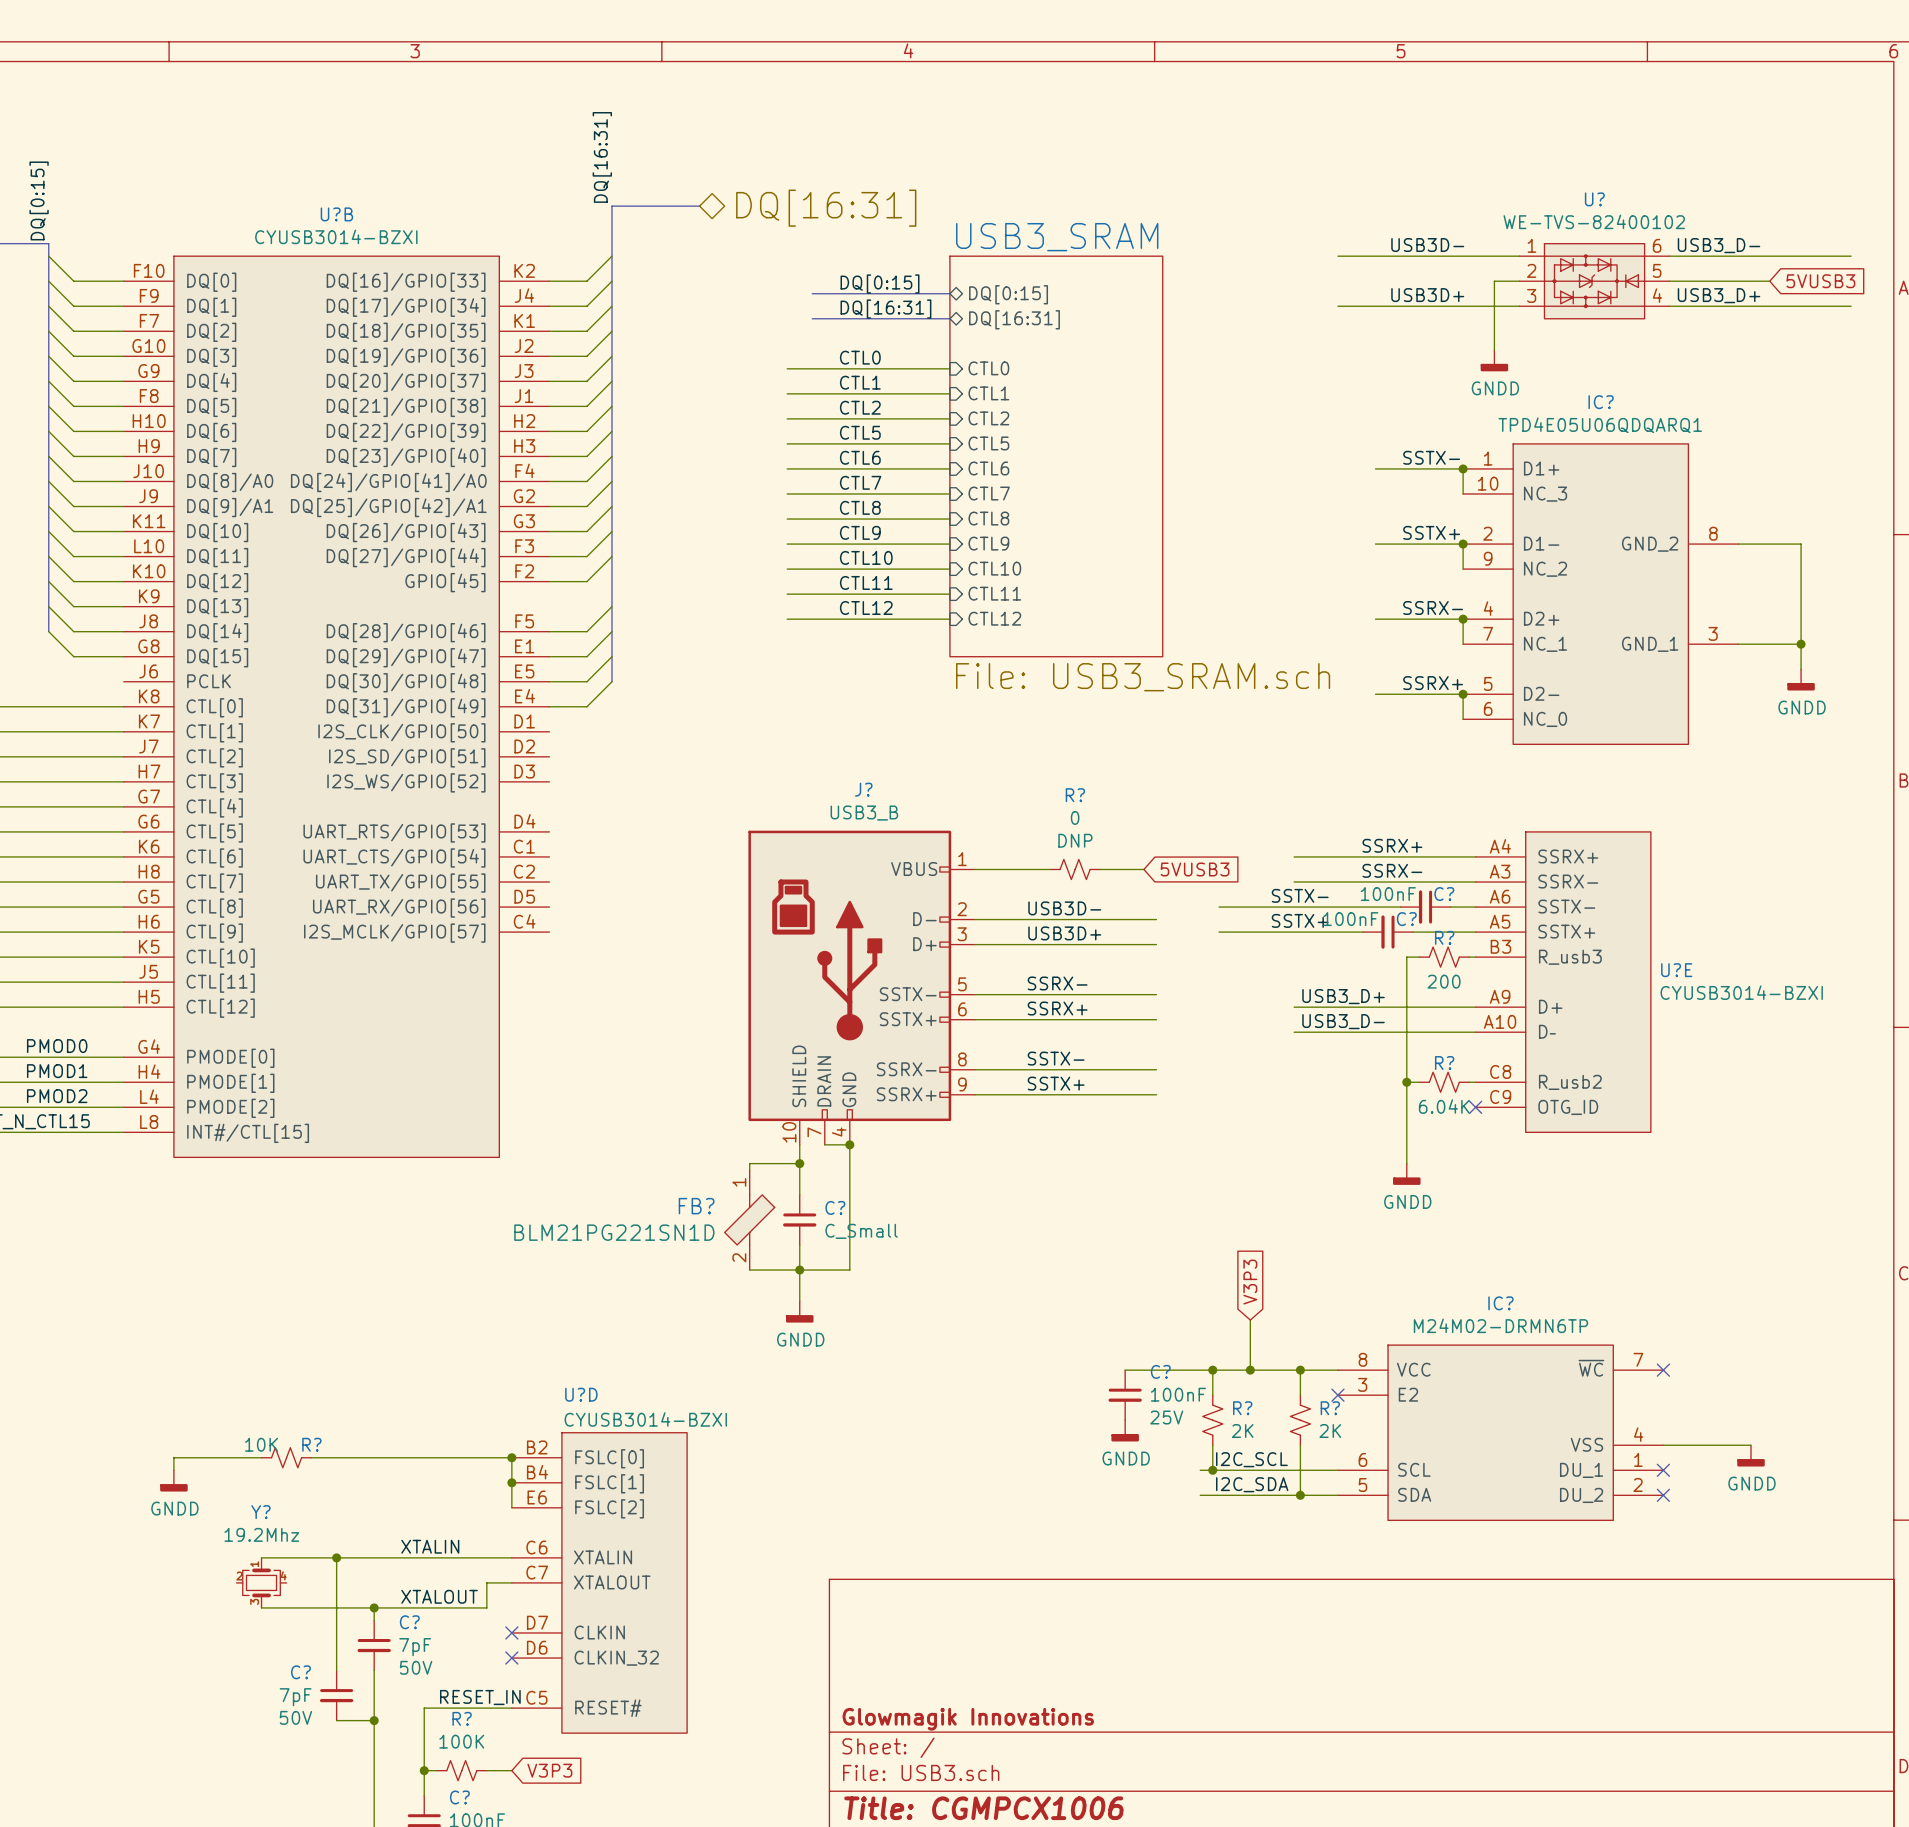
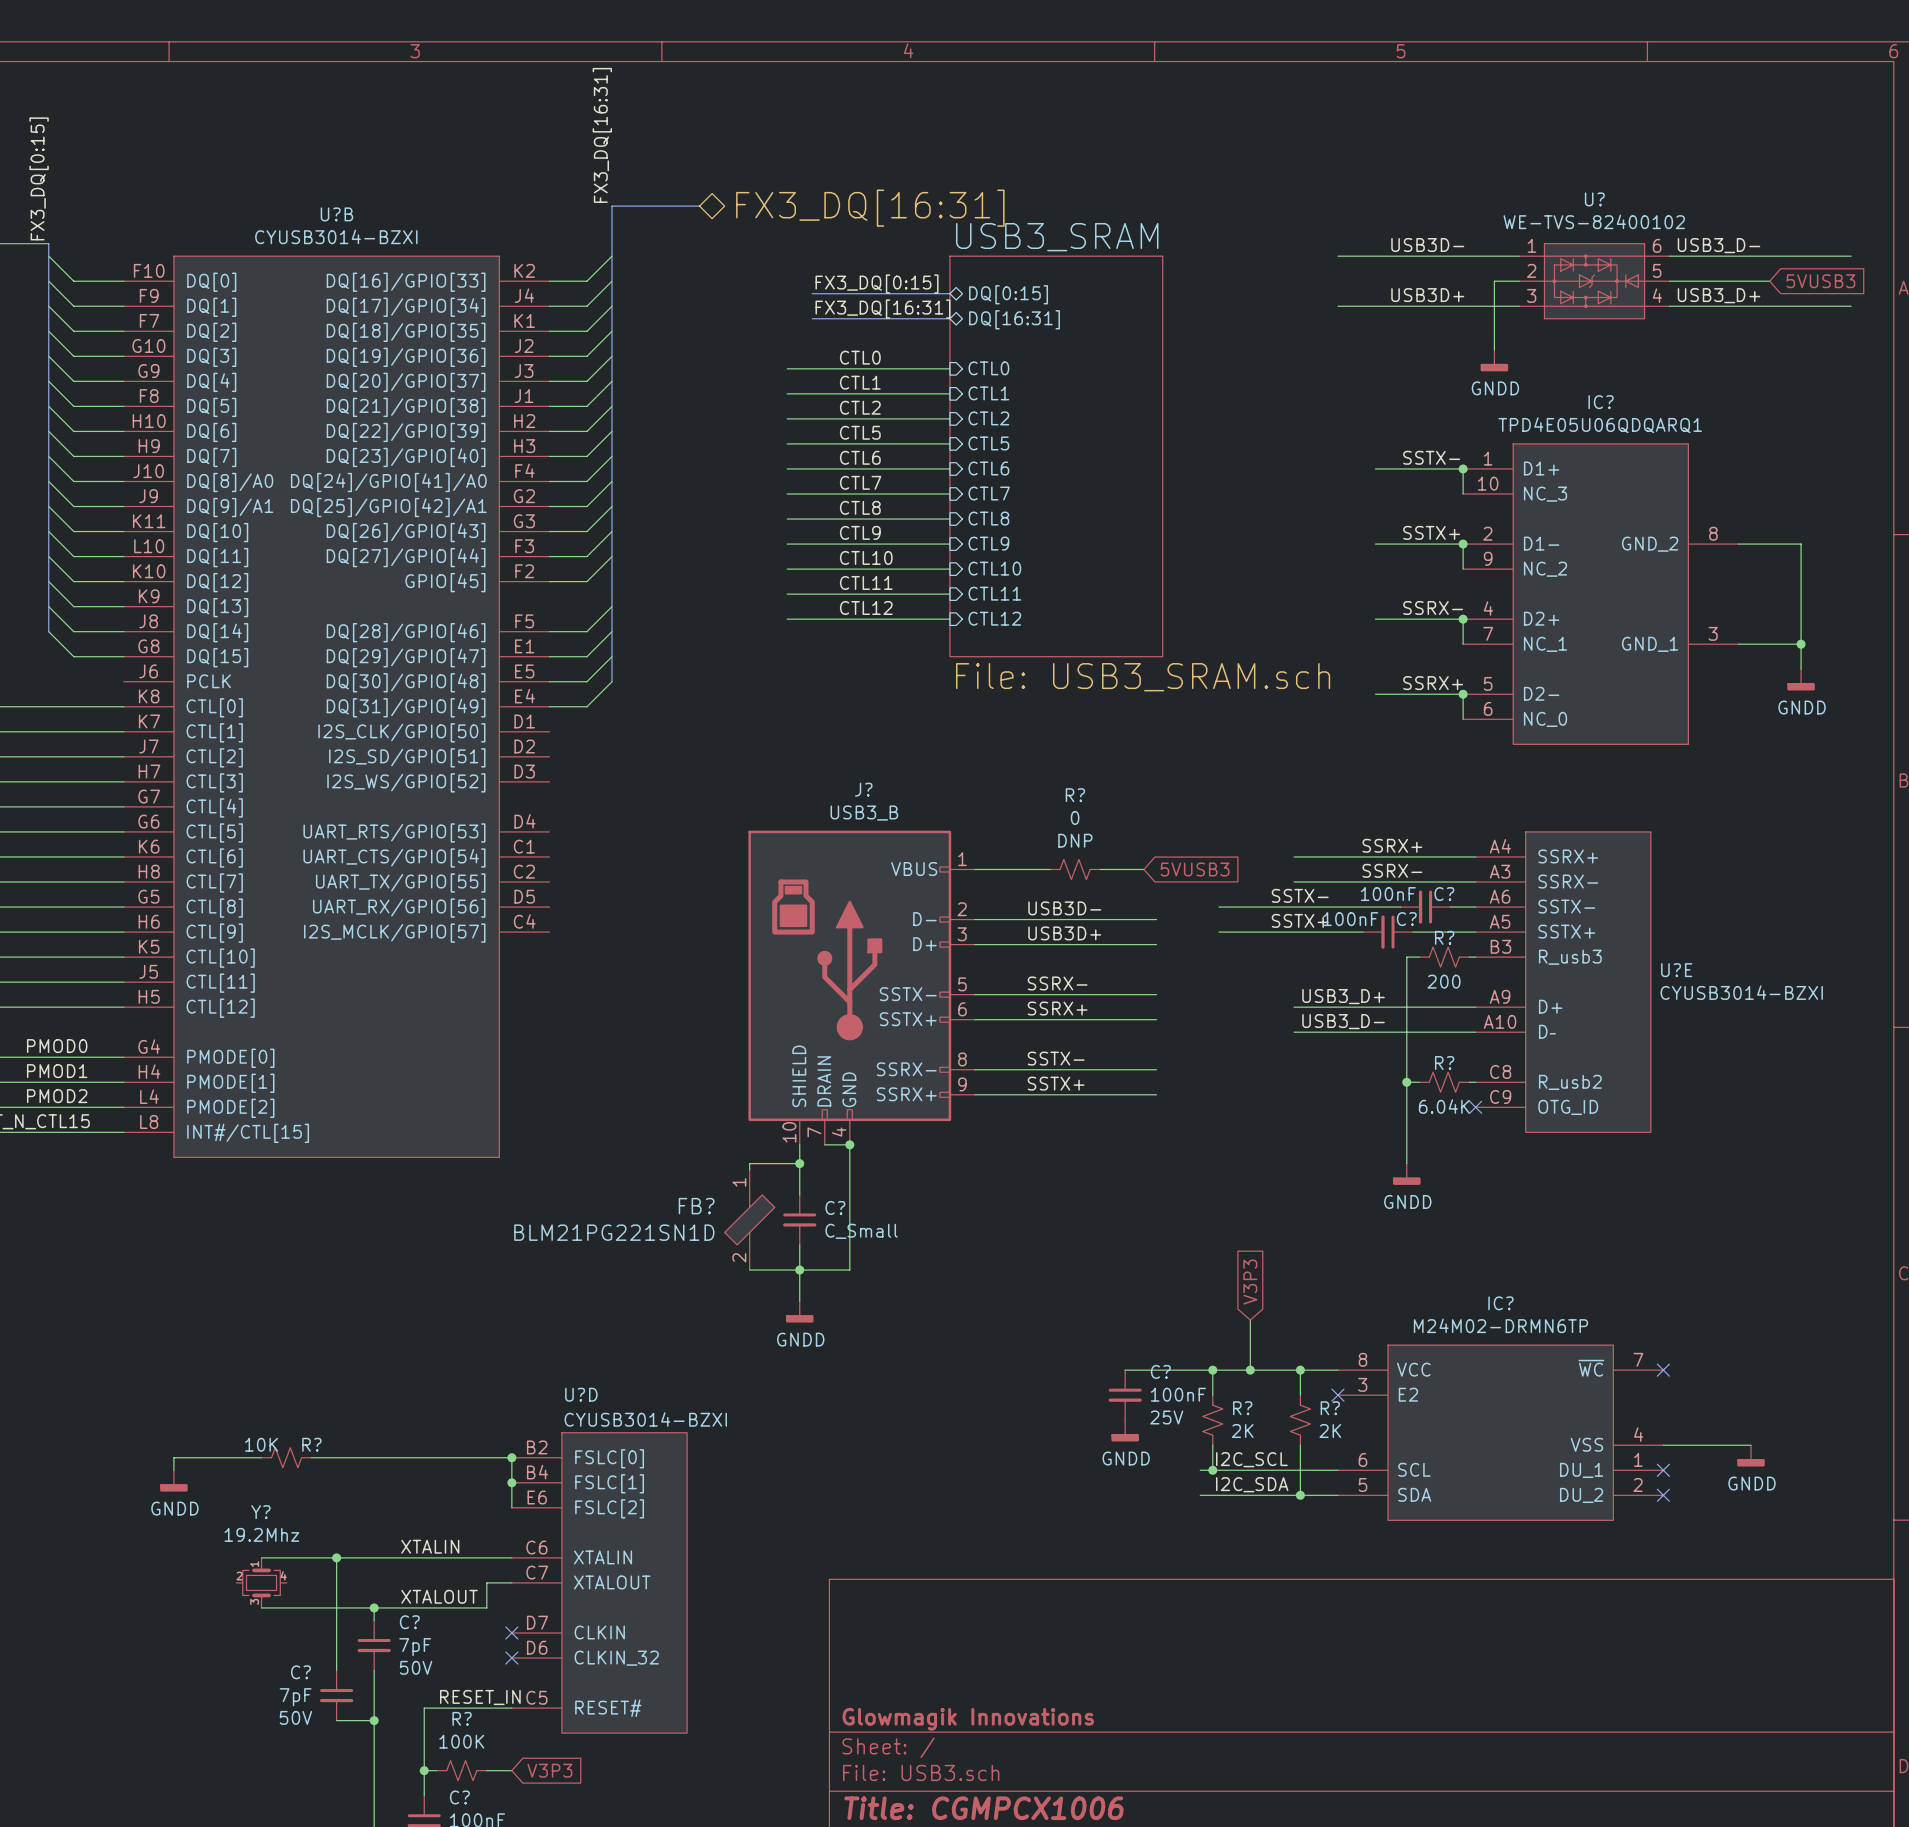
label: DQ[16:31] (602, 157) -> FX3_DQ[16:31] (602, 135)
label: DQ[0:15] (39, 200) -> FX3_DQ[0:15] (39, 178)
hierarchical label: DQ[16:31] (826, 208) -> FX3_DQ[16:31] (870, 208)
label: DQ[0:15] (880, 284) -> FX3_DQ[0:15] (877, 284)
label: DQ[16:31] (885, 309) -> FX3_DQ[16:31] (882, 309)

